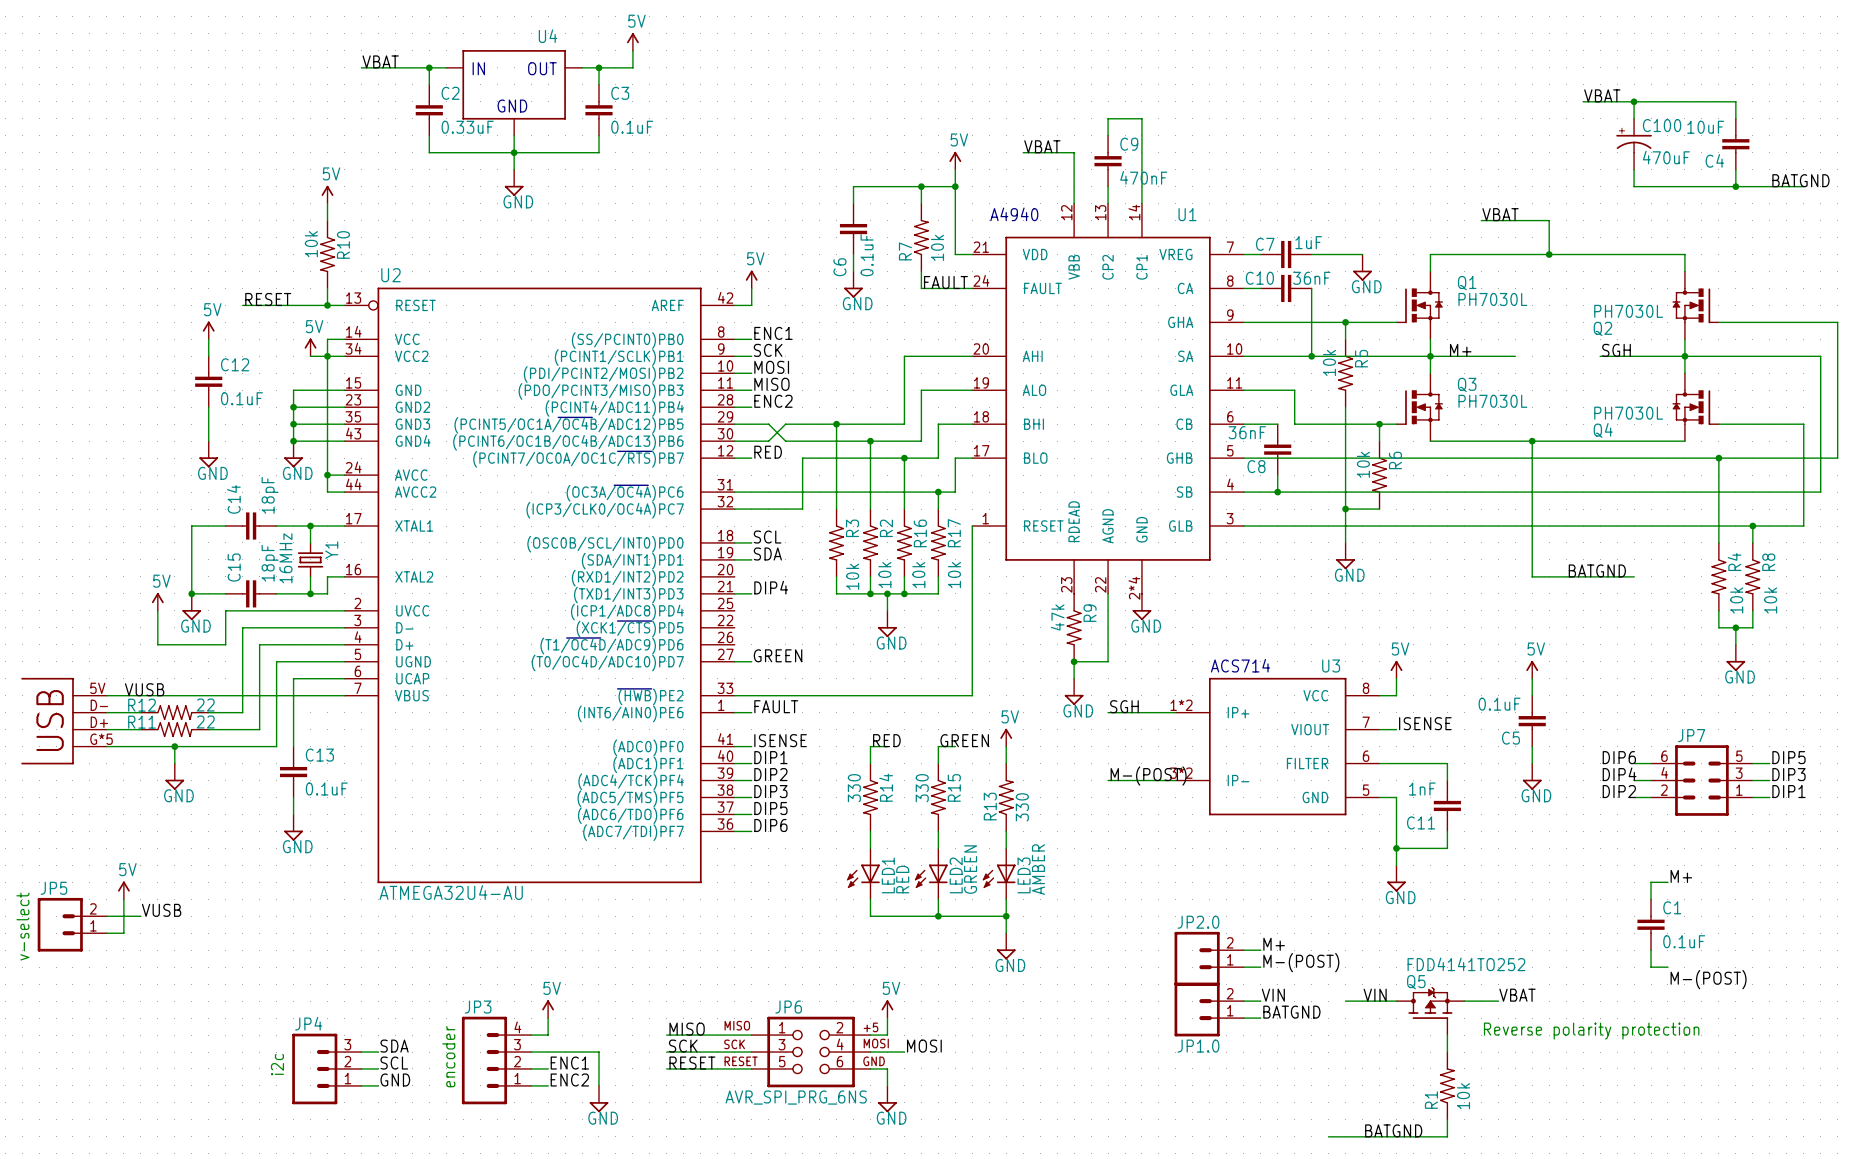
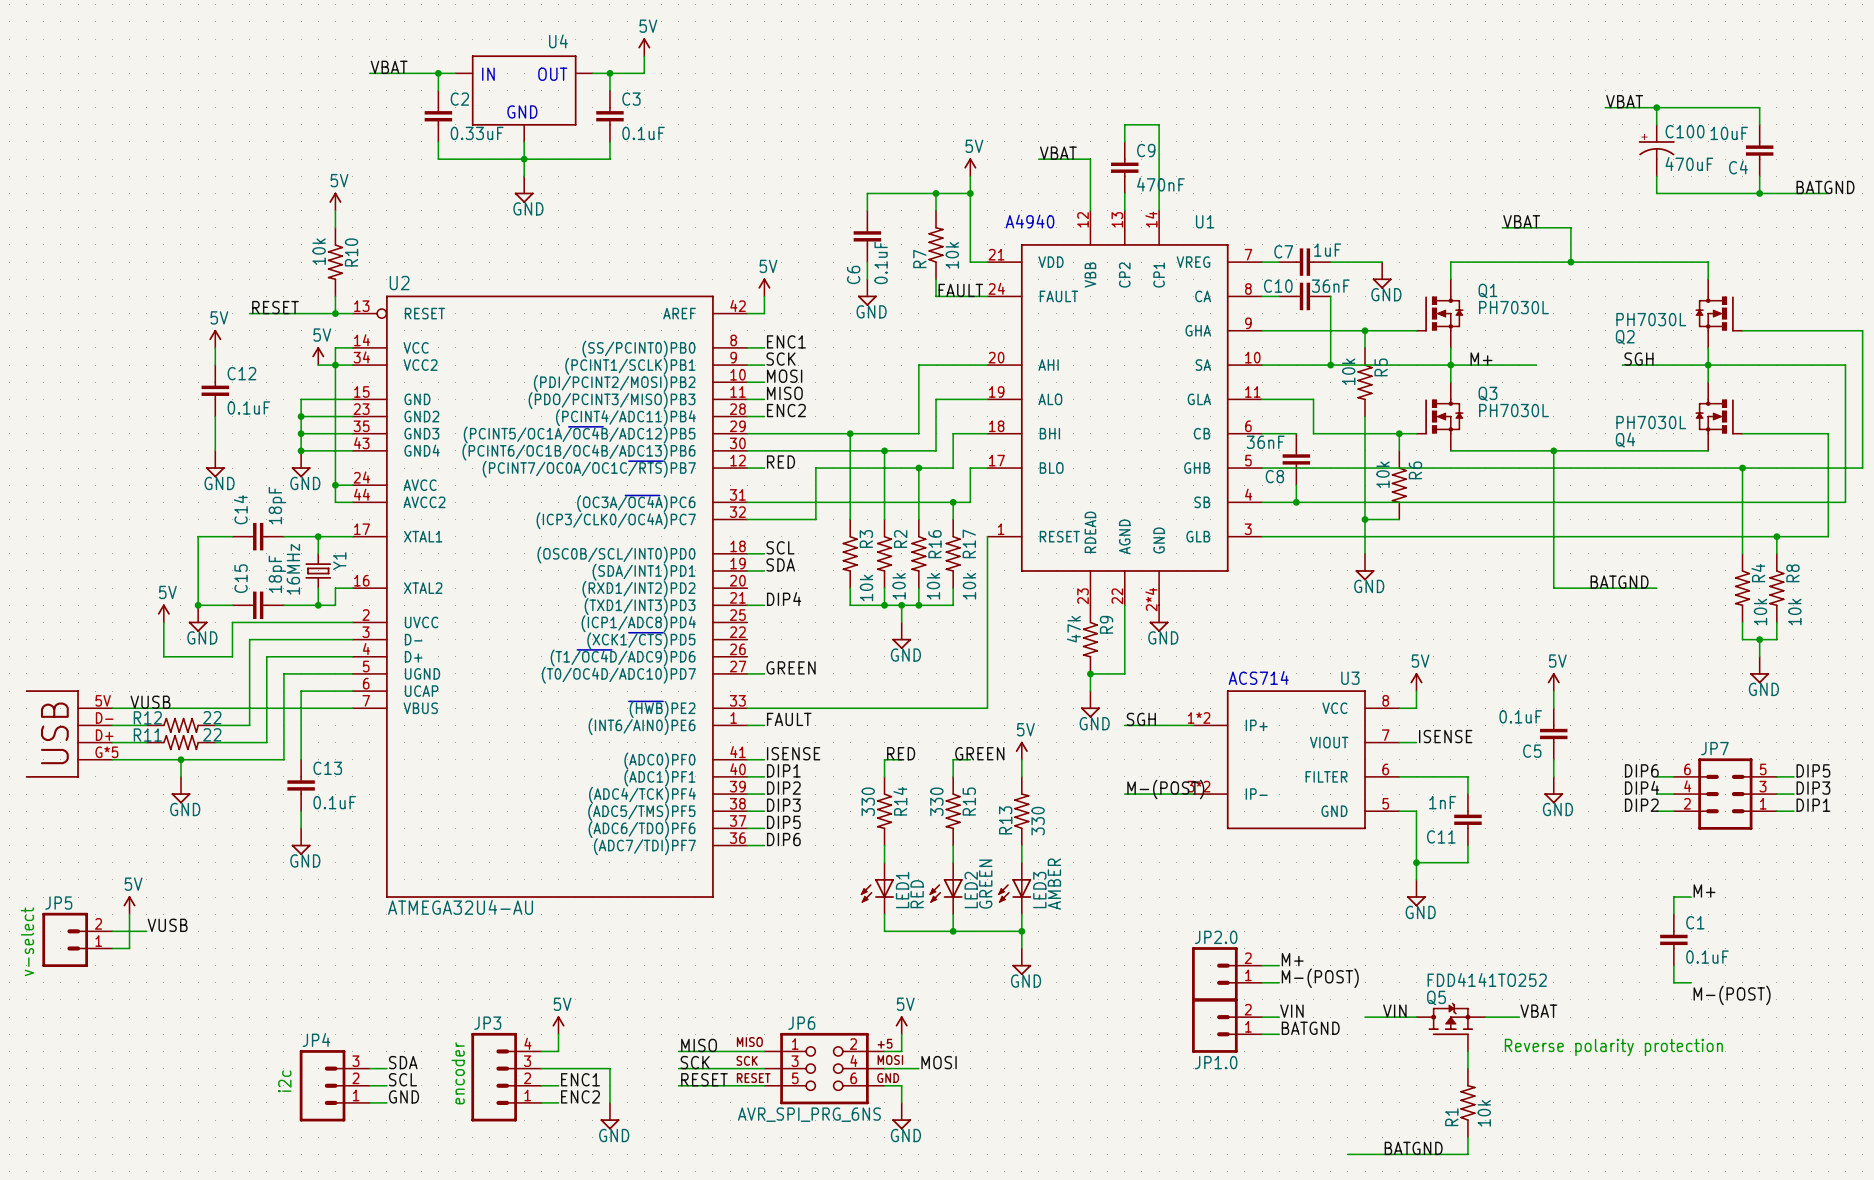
wire: (768, 424) (785, 441) -> (781, 433) (798, 433)
wire: (785, 424) (768, 441) -> (798, 450) (781, 450)

